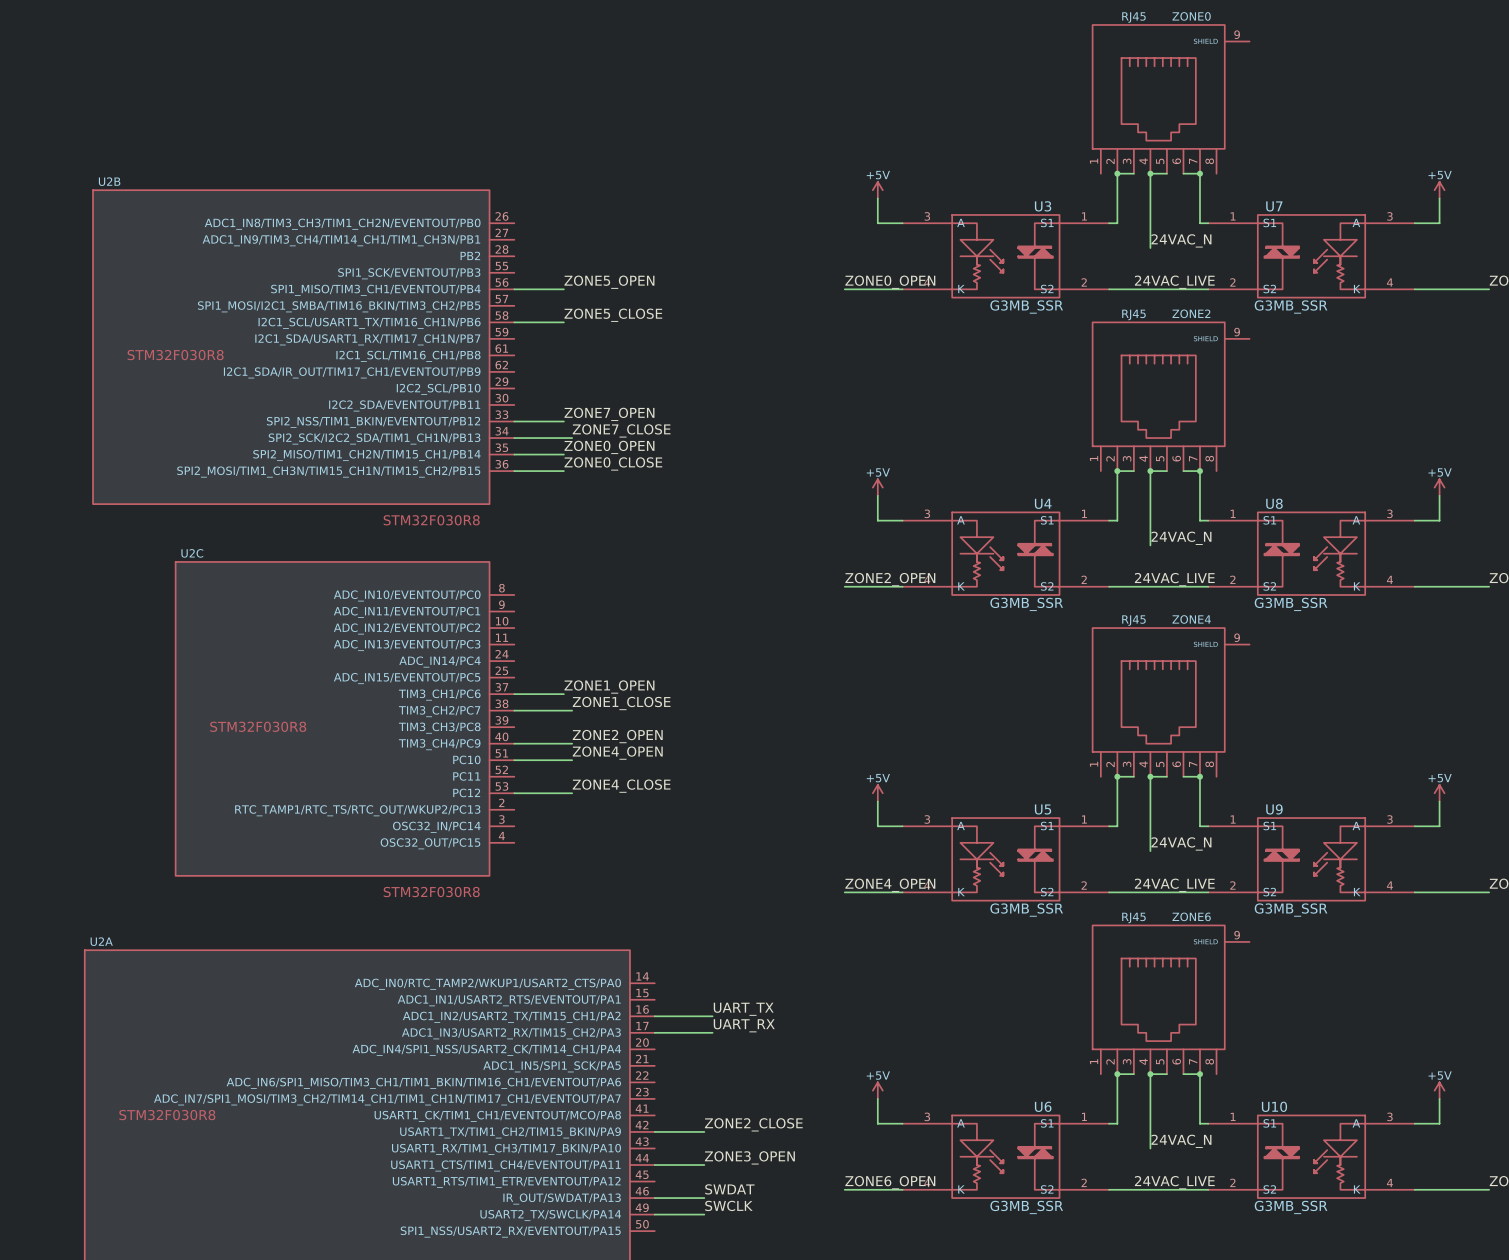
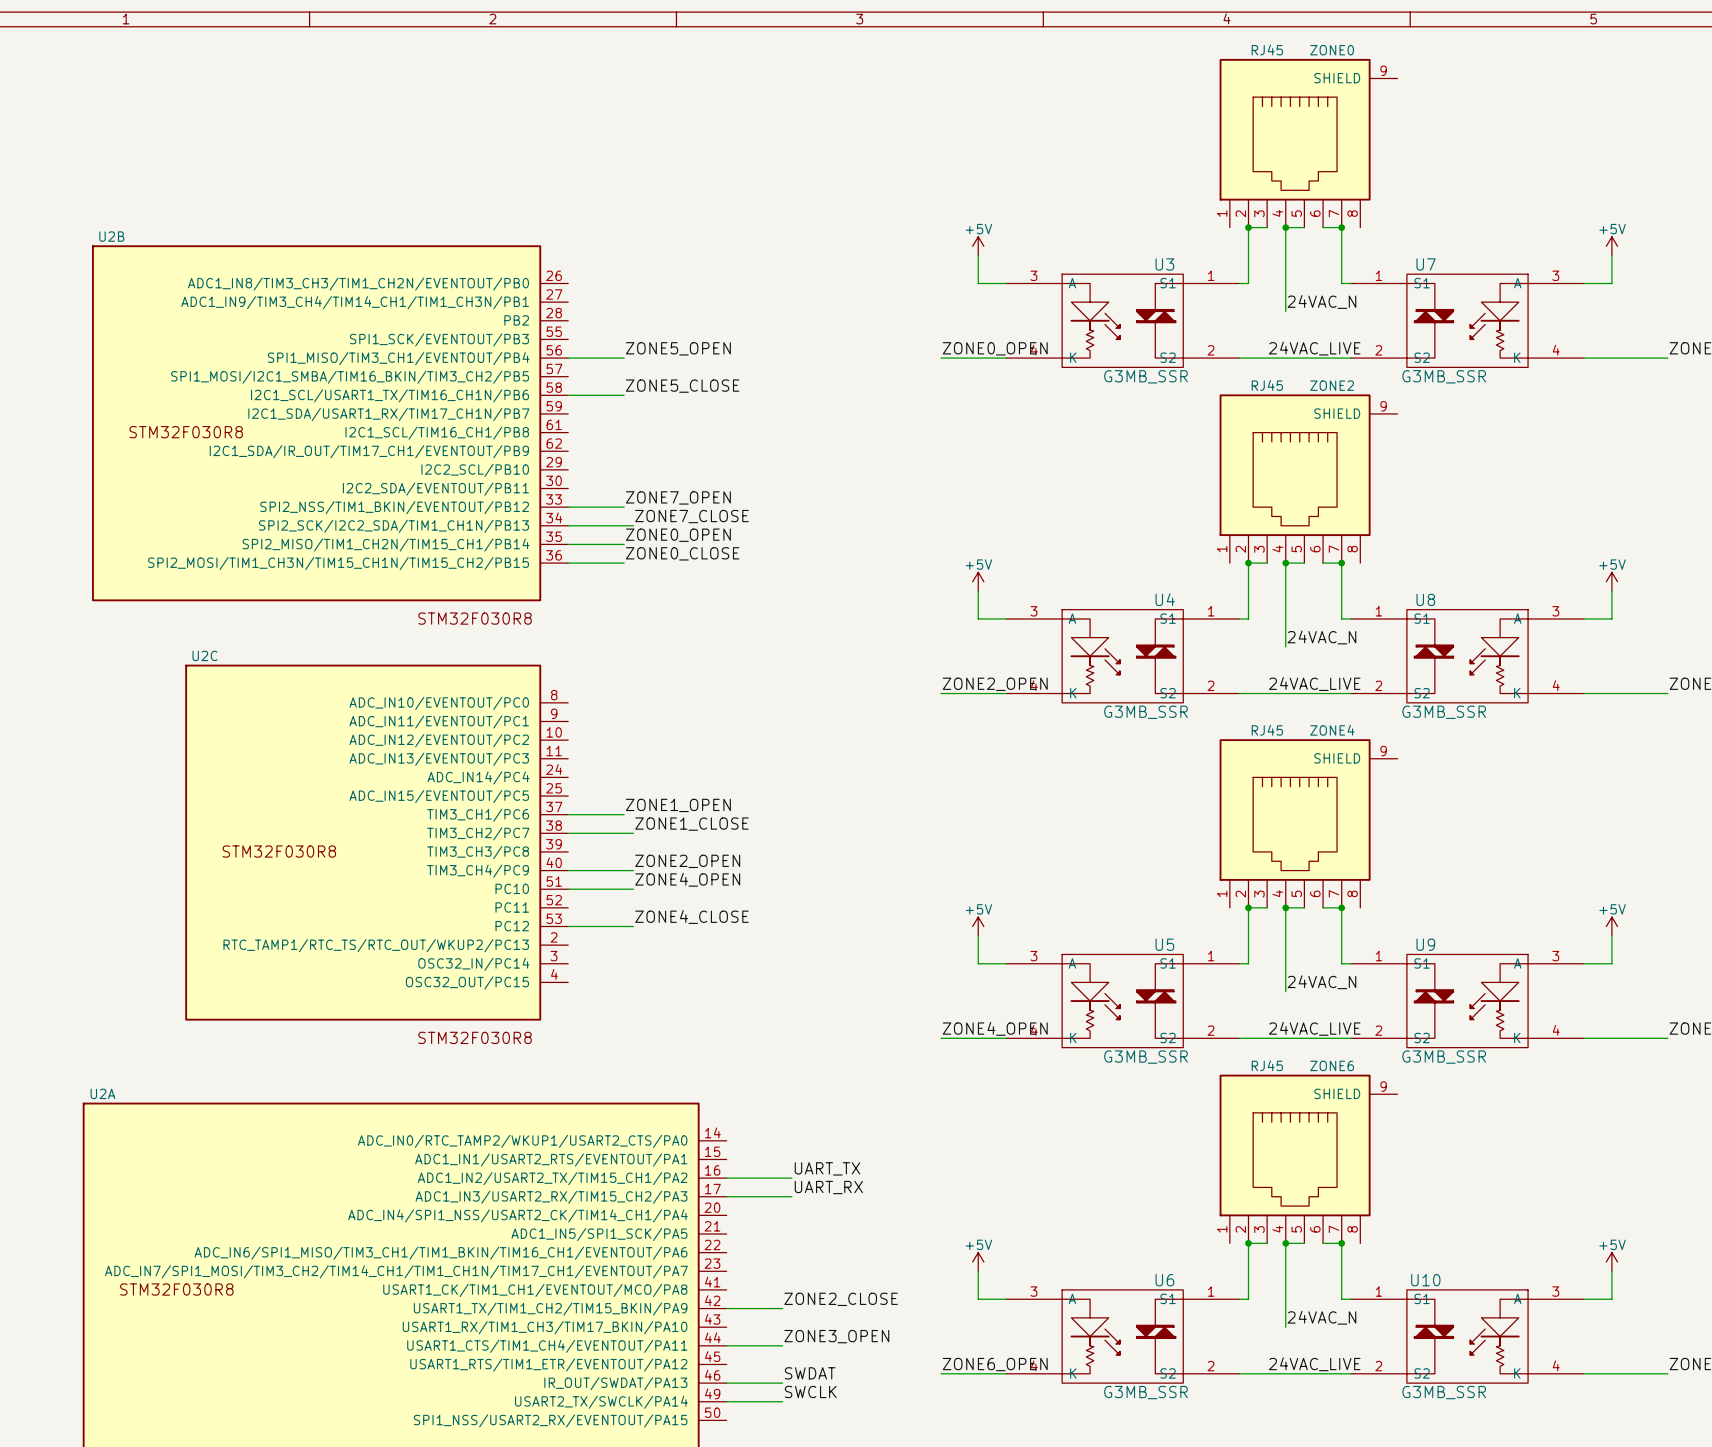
ZONE0 symbol: [1092, 24, 1250, 174] -> [1219, 58, 1398, 228]
ZONE2 symbol: [1092, 322, 1250, 472] -> [1219, 394, 1398, 564]
ZONE4 symbol: [1092, 628, 1250, 777] -> [1219, 739, 1398, 908]
ZONE6 symbol: [1092, 925, 1250, 1075] -> [1219, 1074, 1398, 1244]

